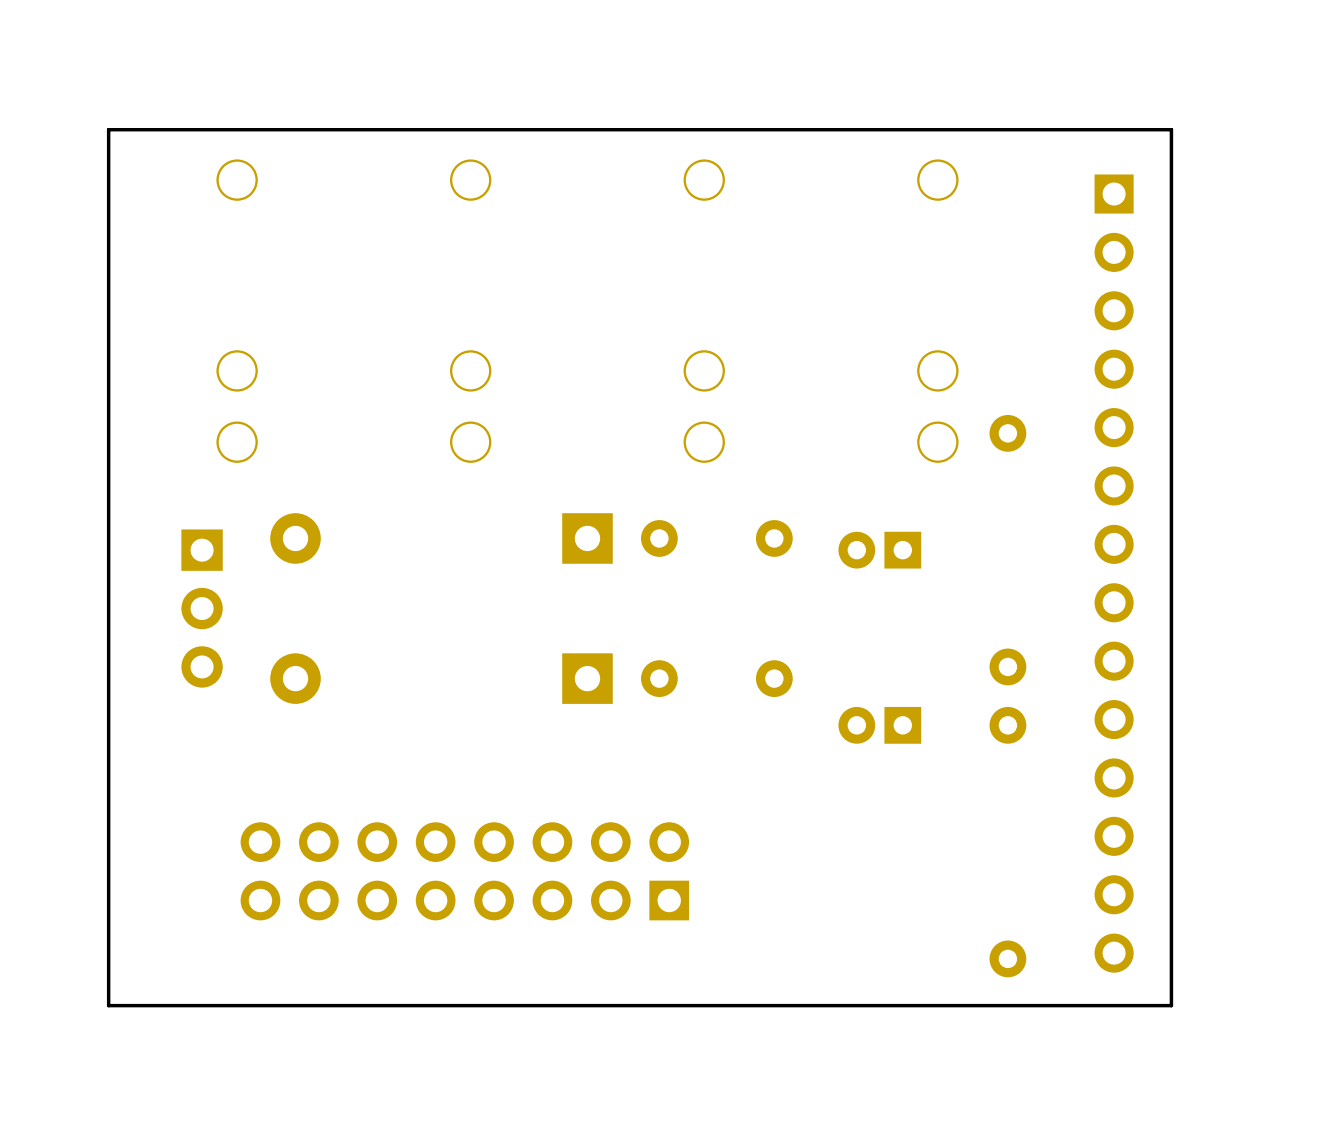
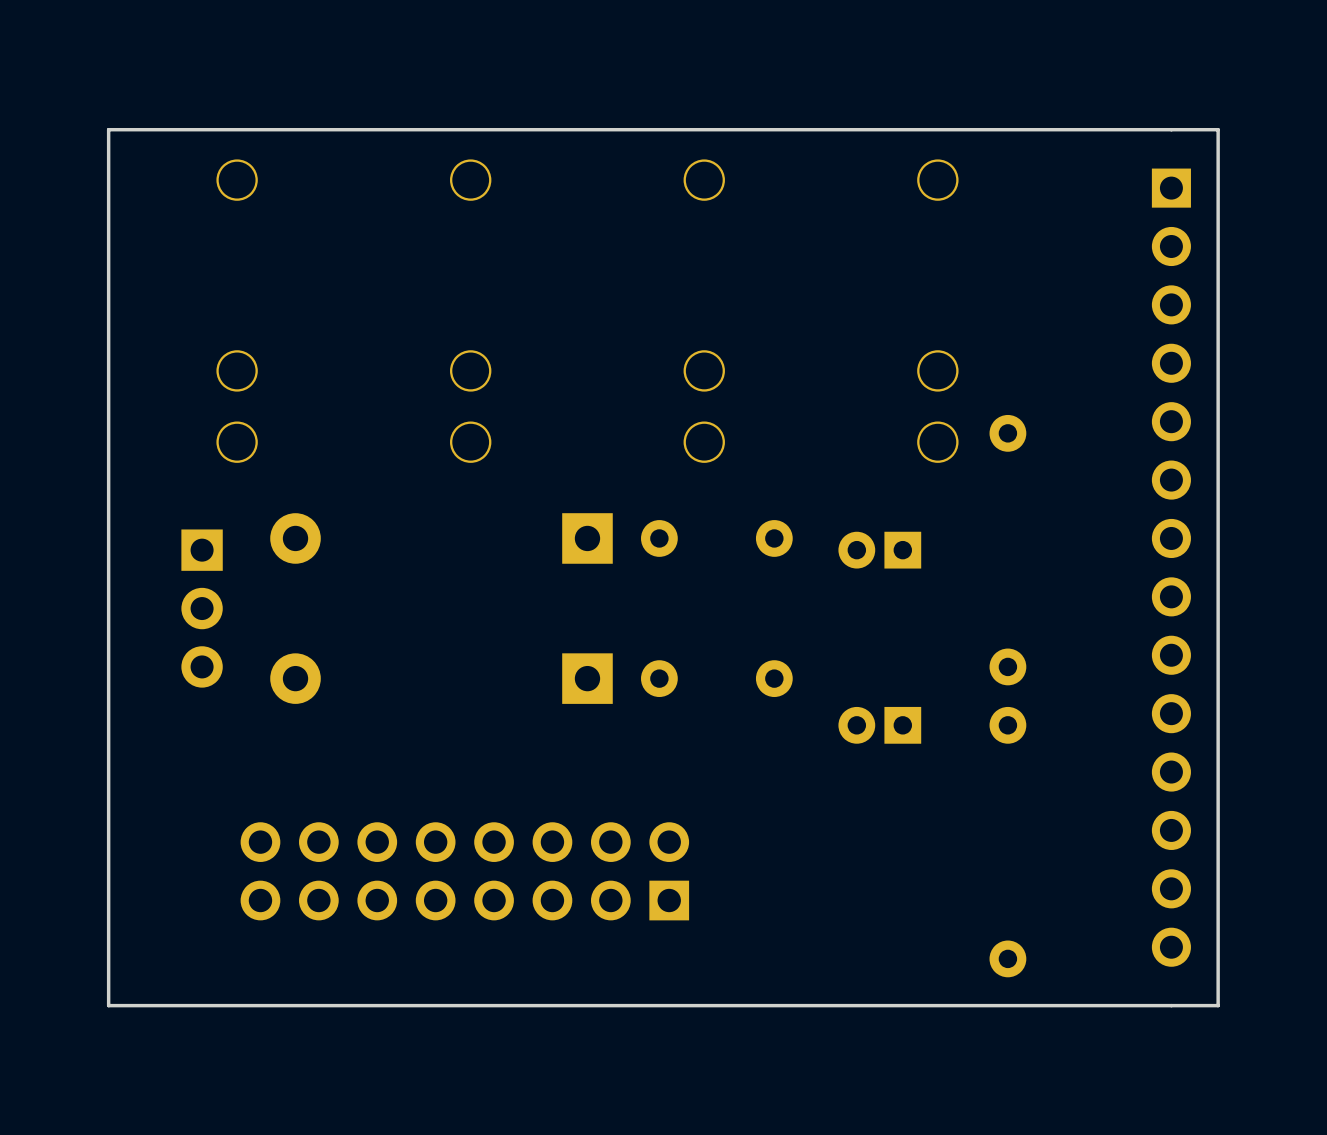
board edge: (1171, 129) (1171, 1005) -> (1171, 129) (1218, 129) (1218, 1005) (1171, 1005)
part position: (1114, 573) -> (1171, 567)

